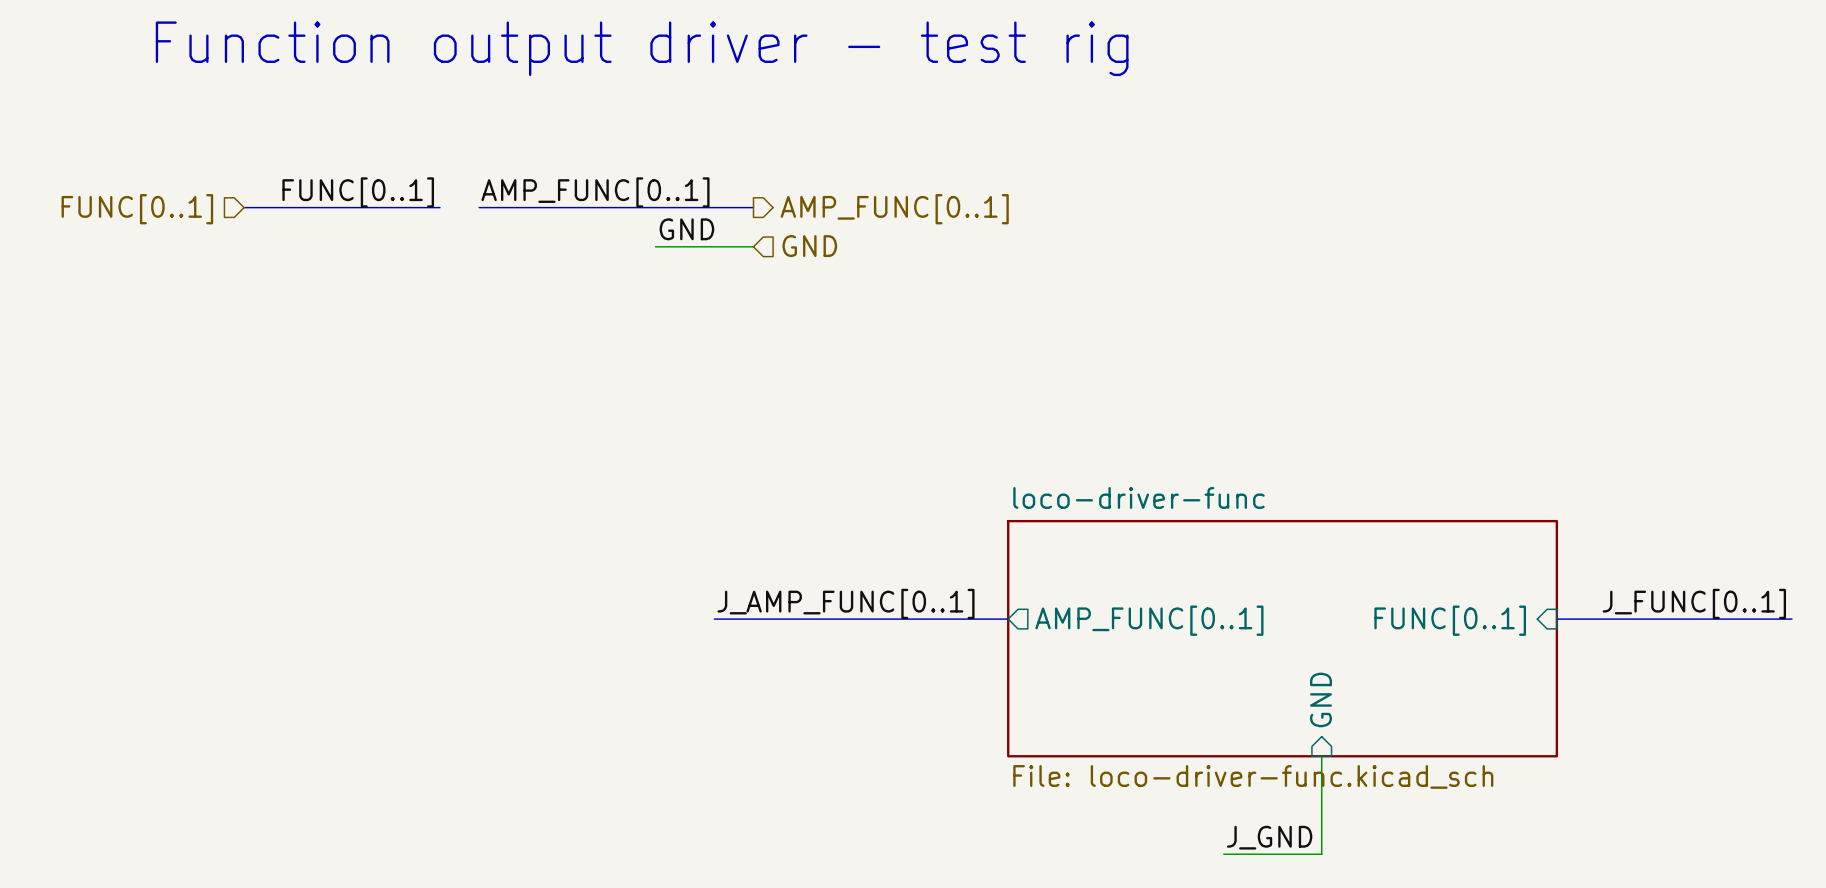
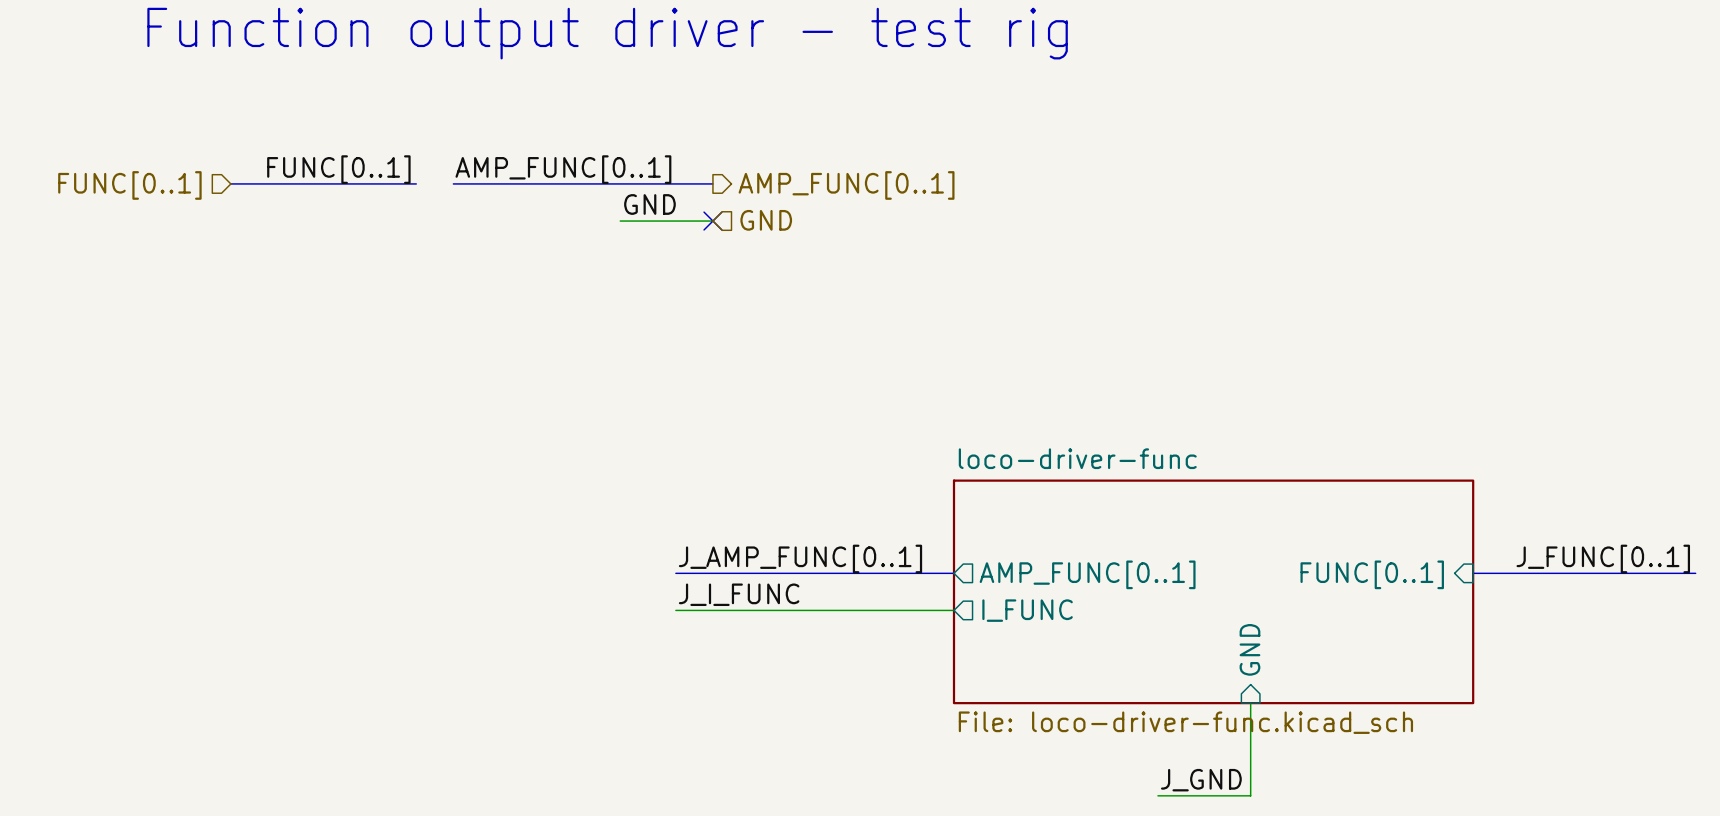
no-connect mark: none -> (712, 221)
label: none -> J_I_FUNC (739, 594)
wire: none -> (675, 610) (954, 610)
sheet pin: none -> I_FUNC (1027, 610)

